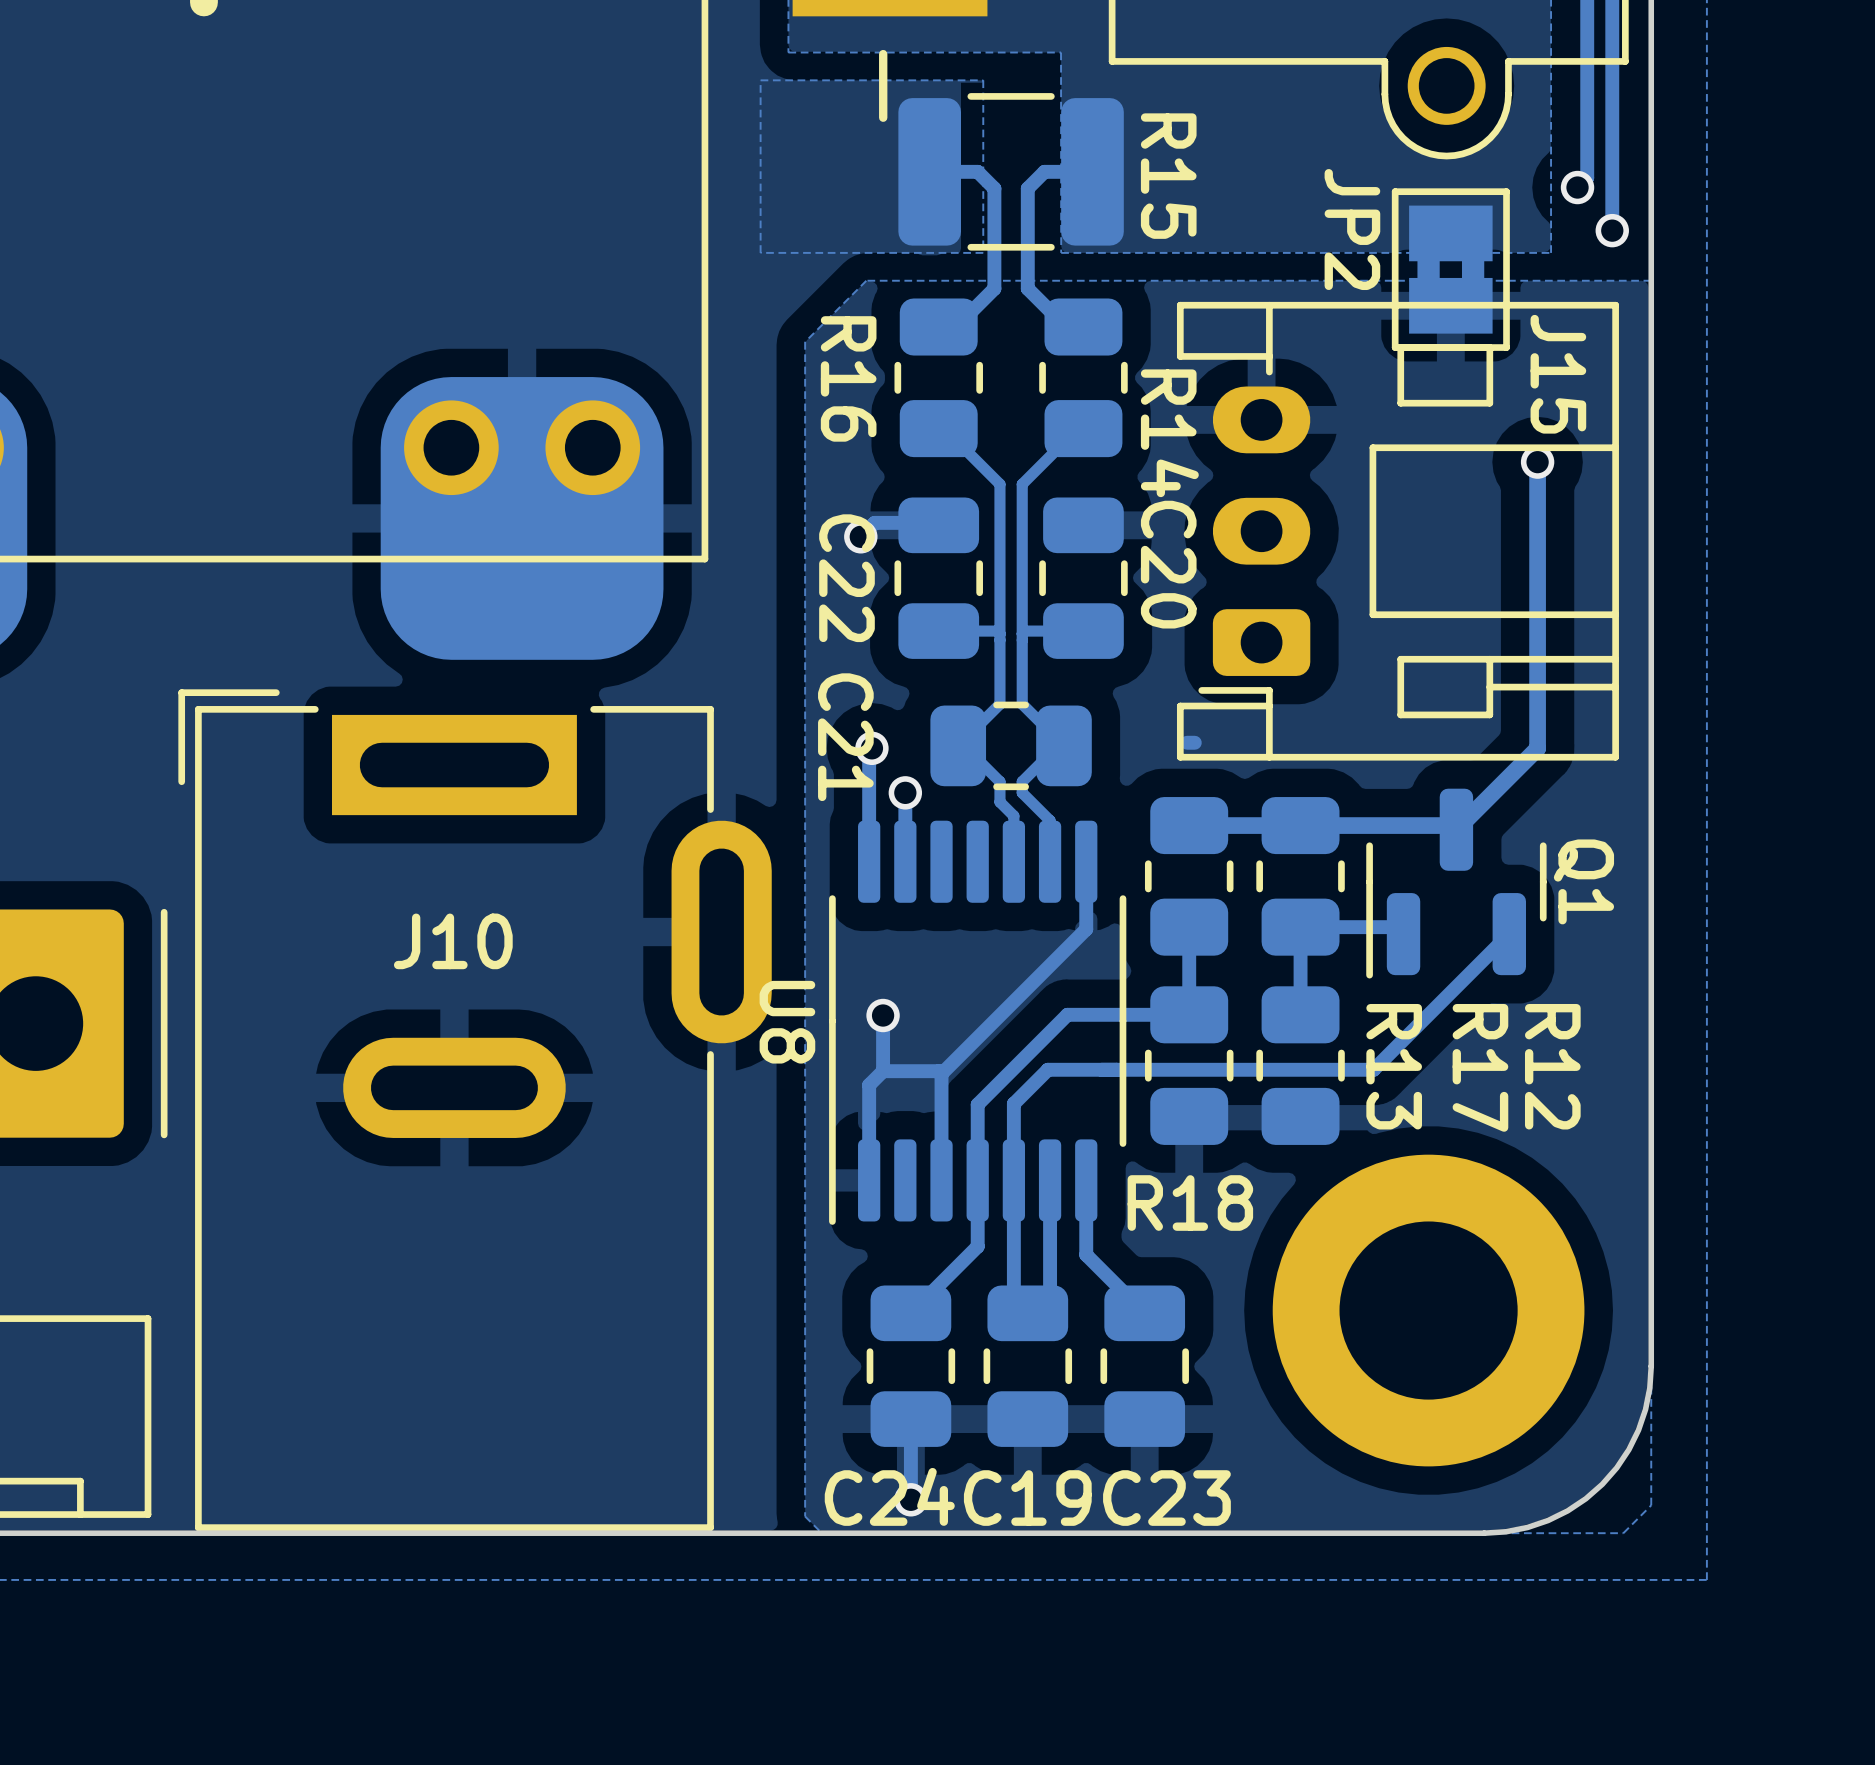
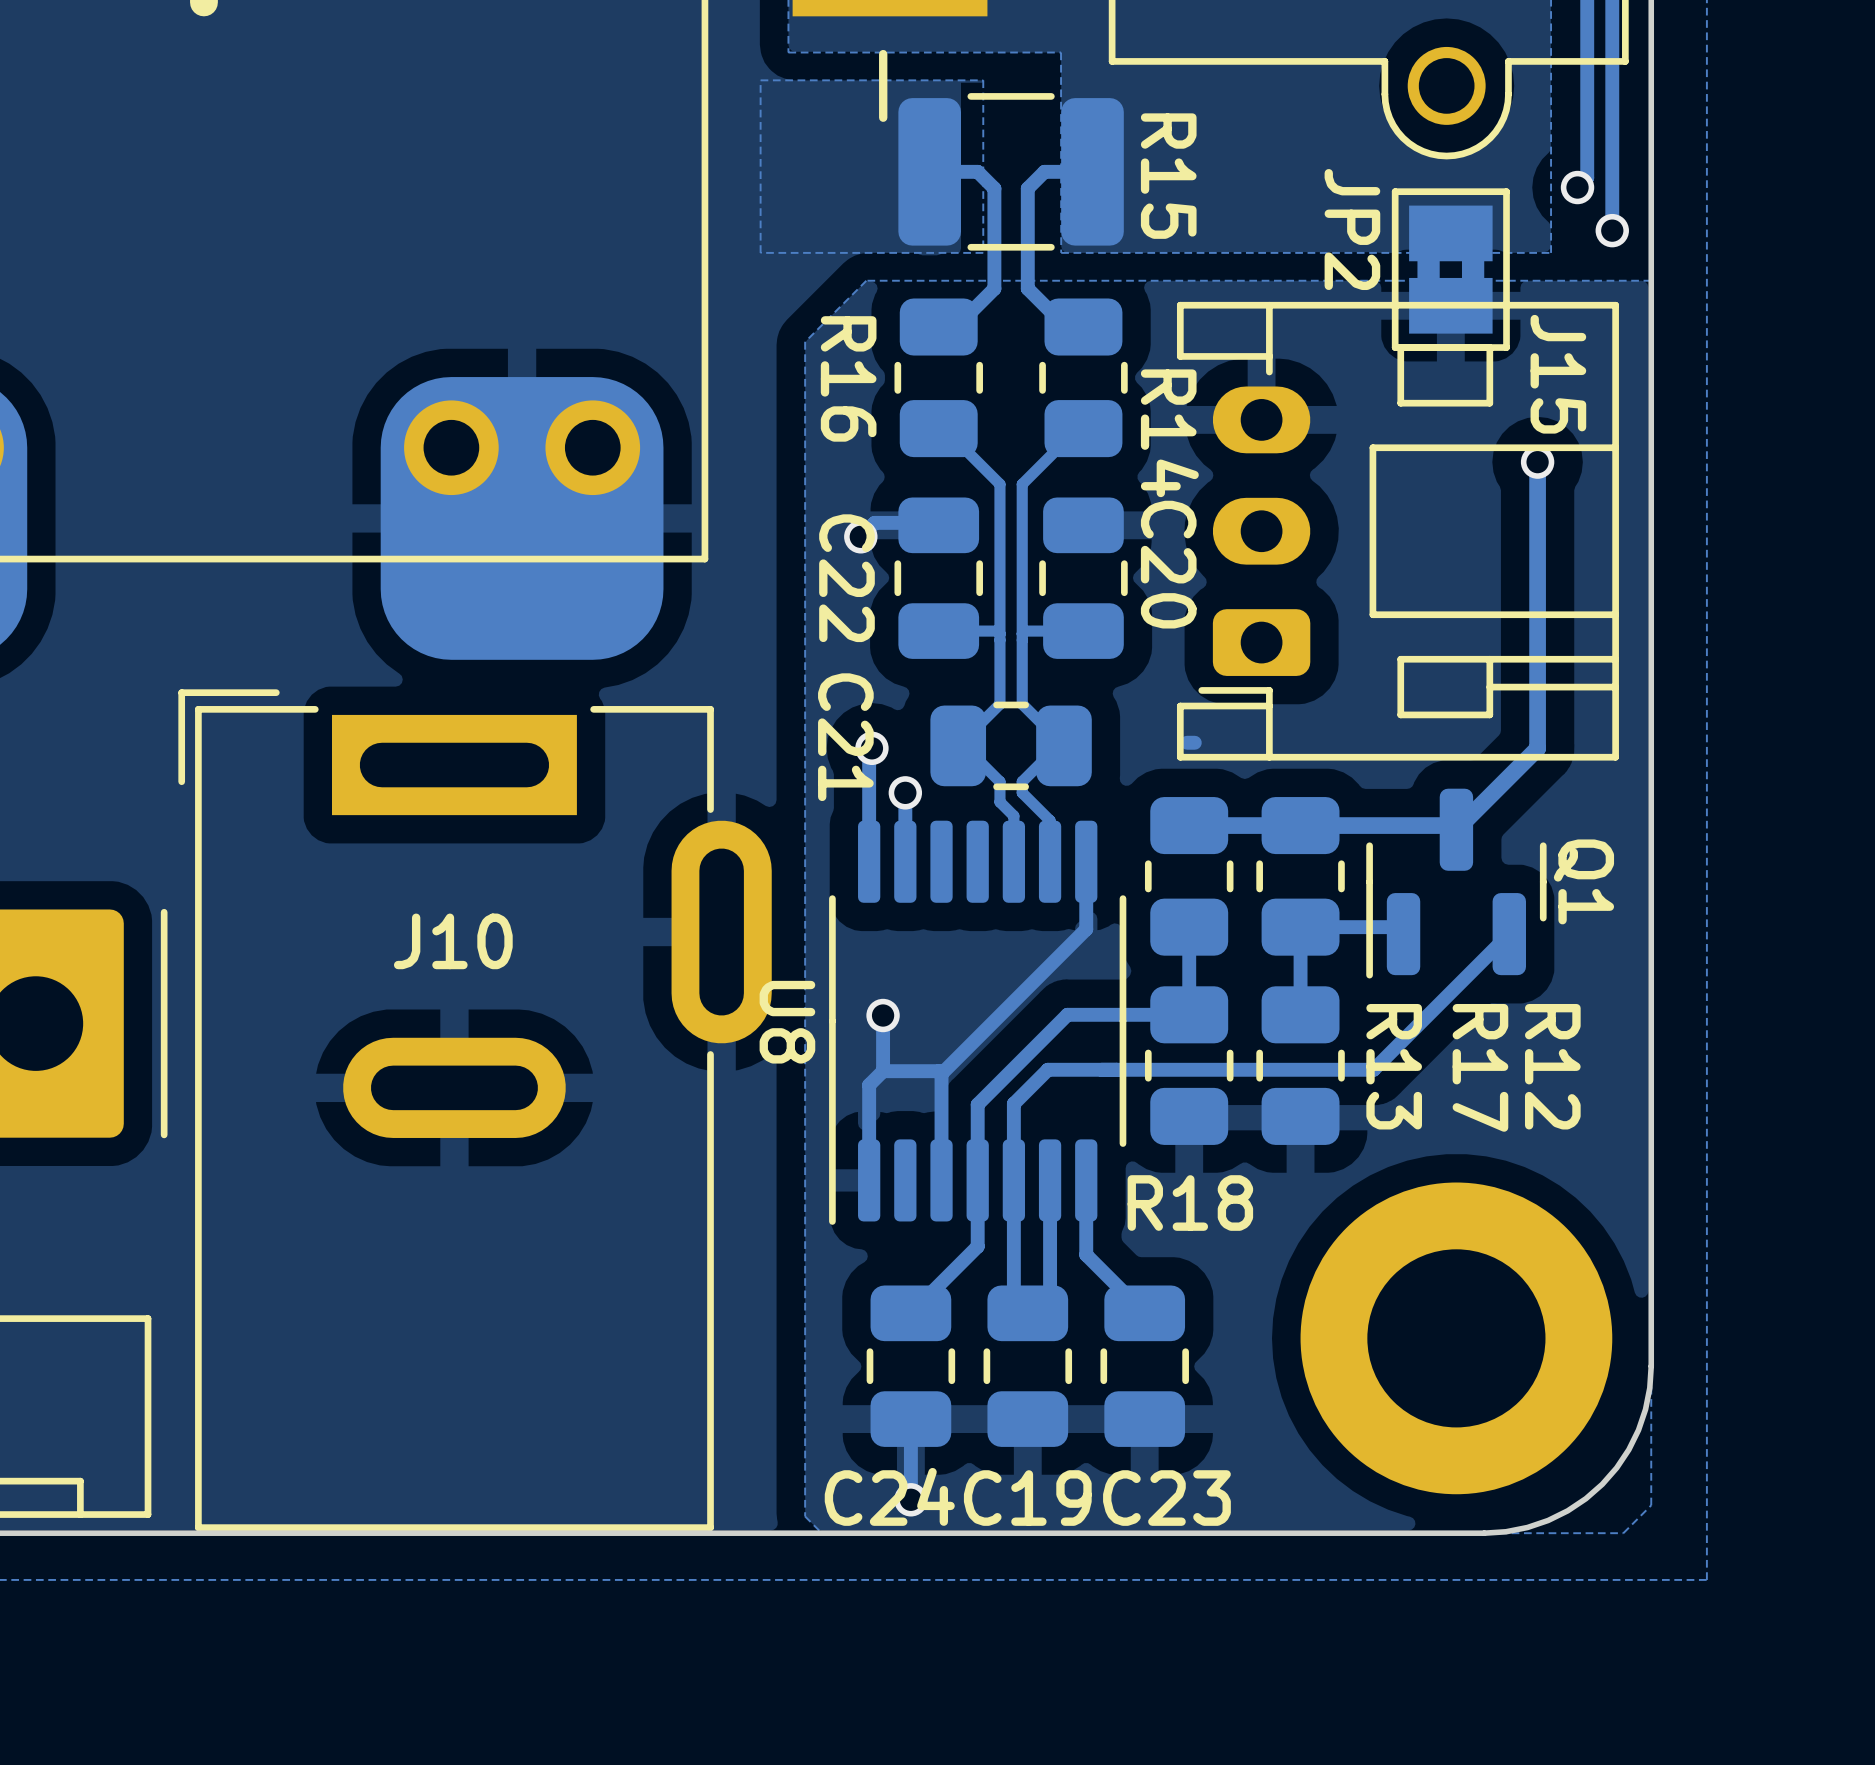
part position: (1428, 1310) -> (1456, 1338)

